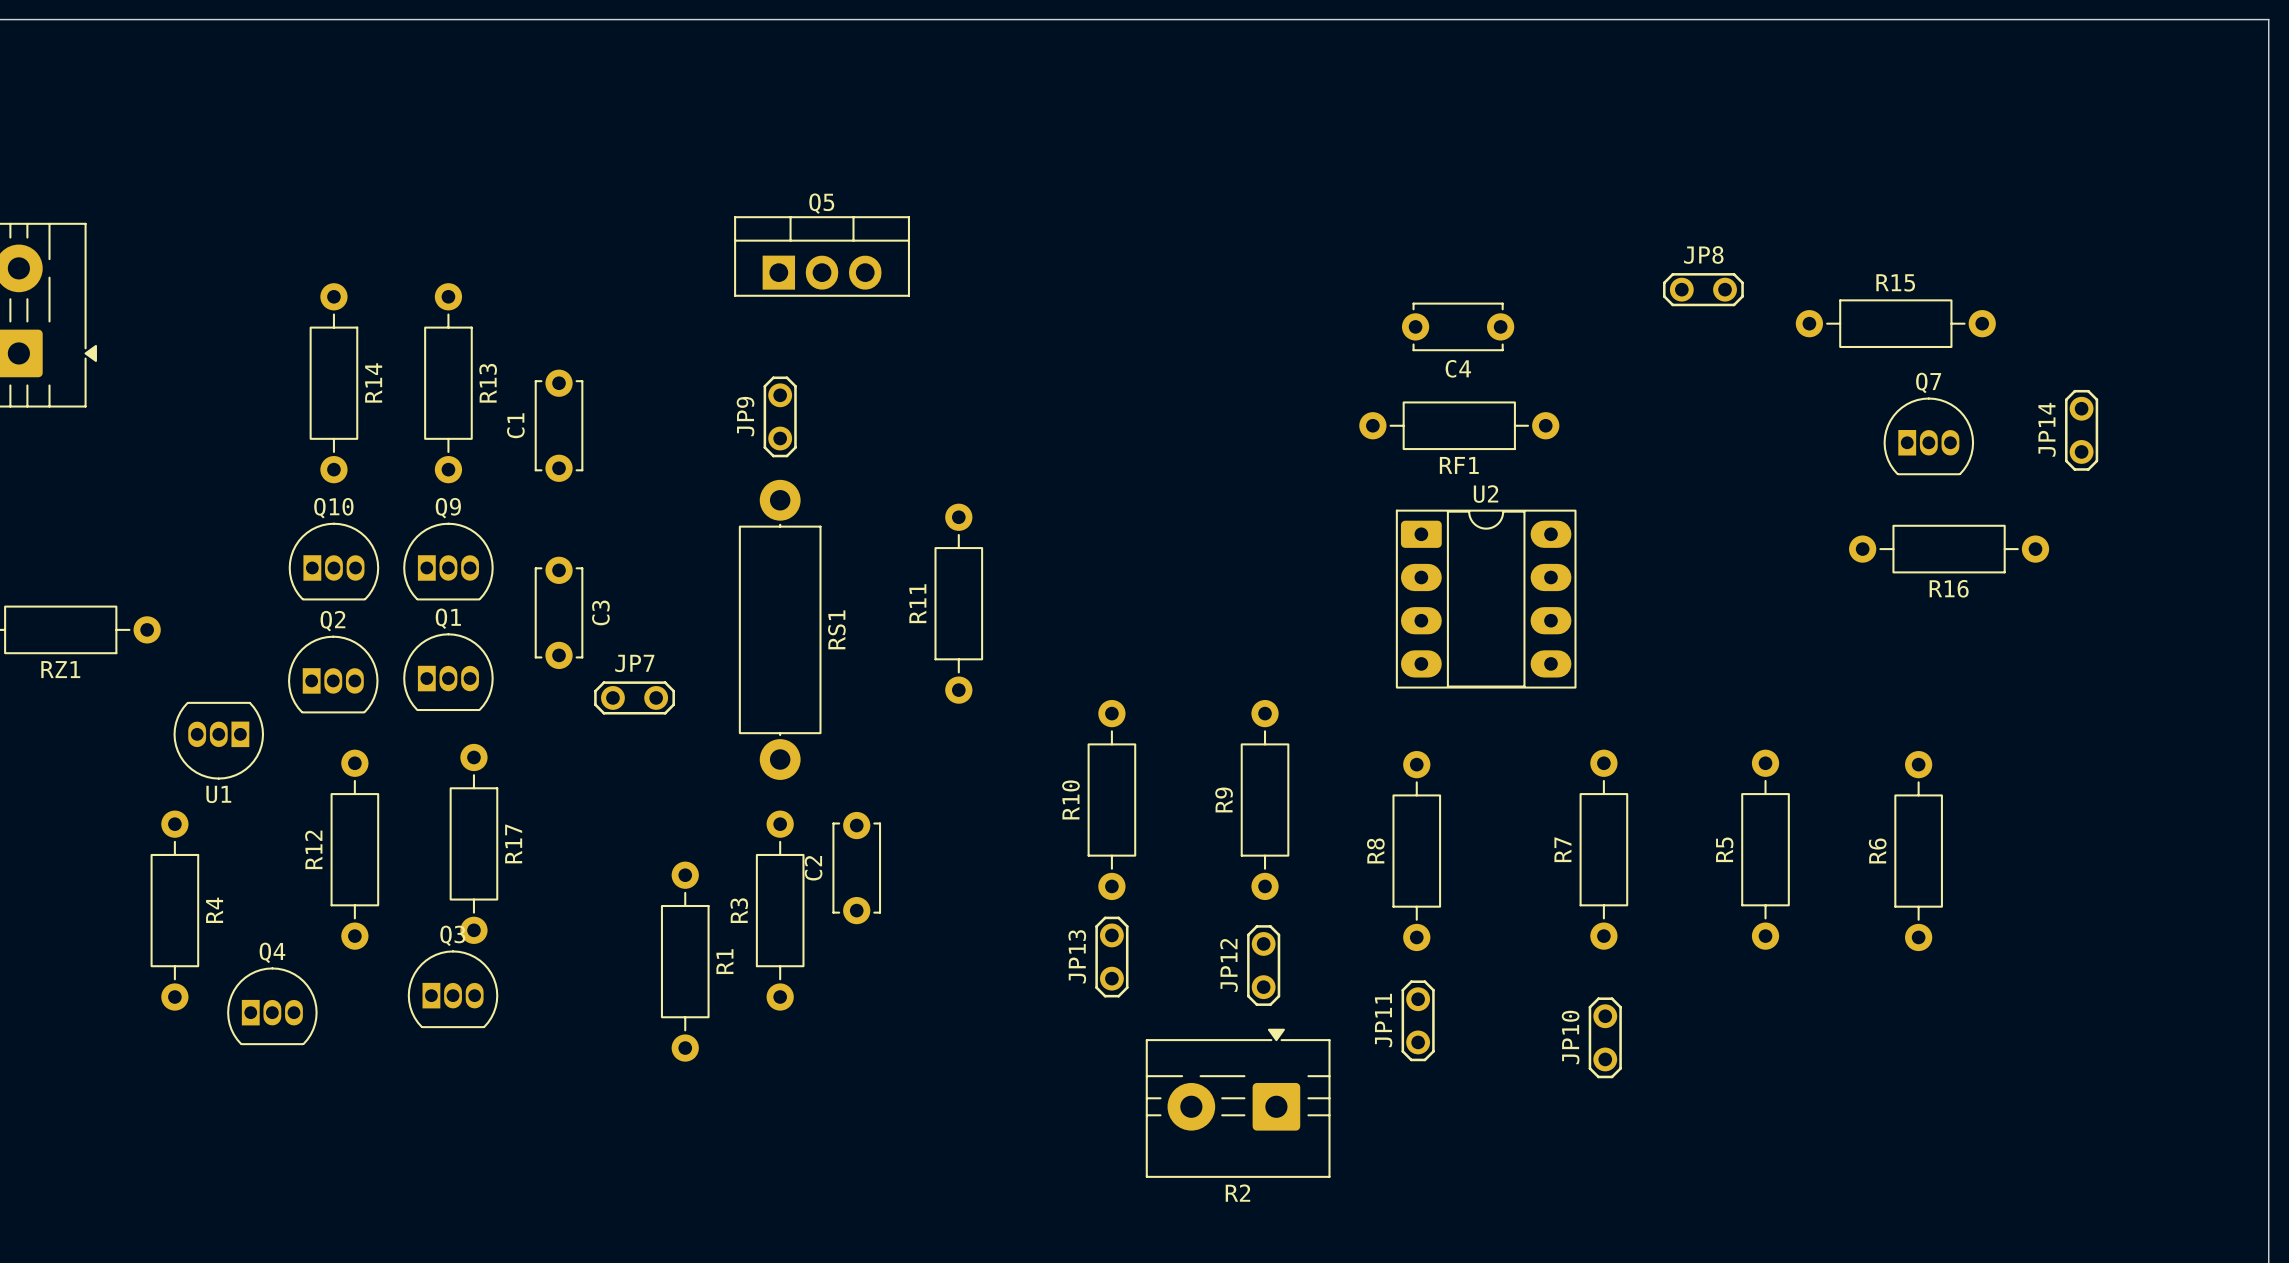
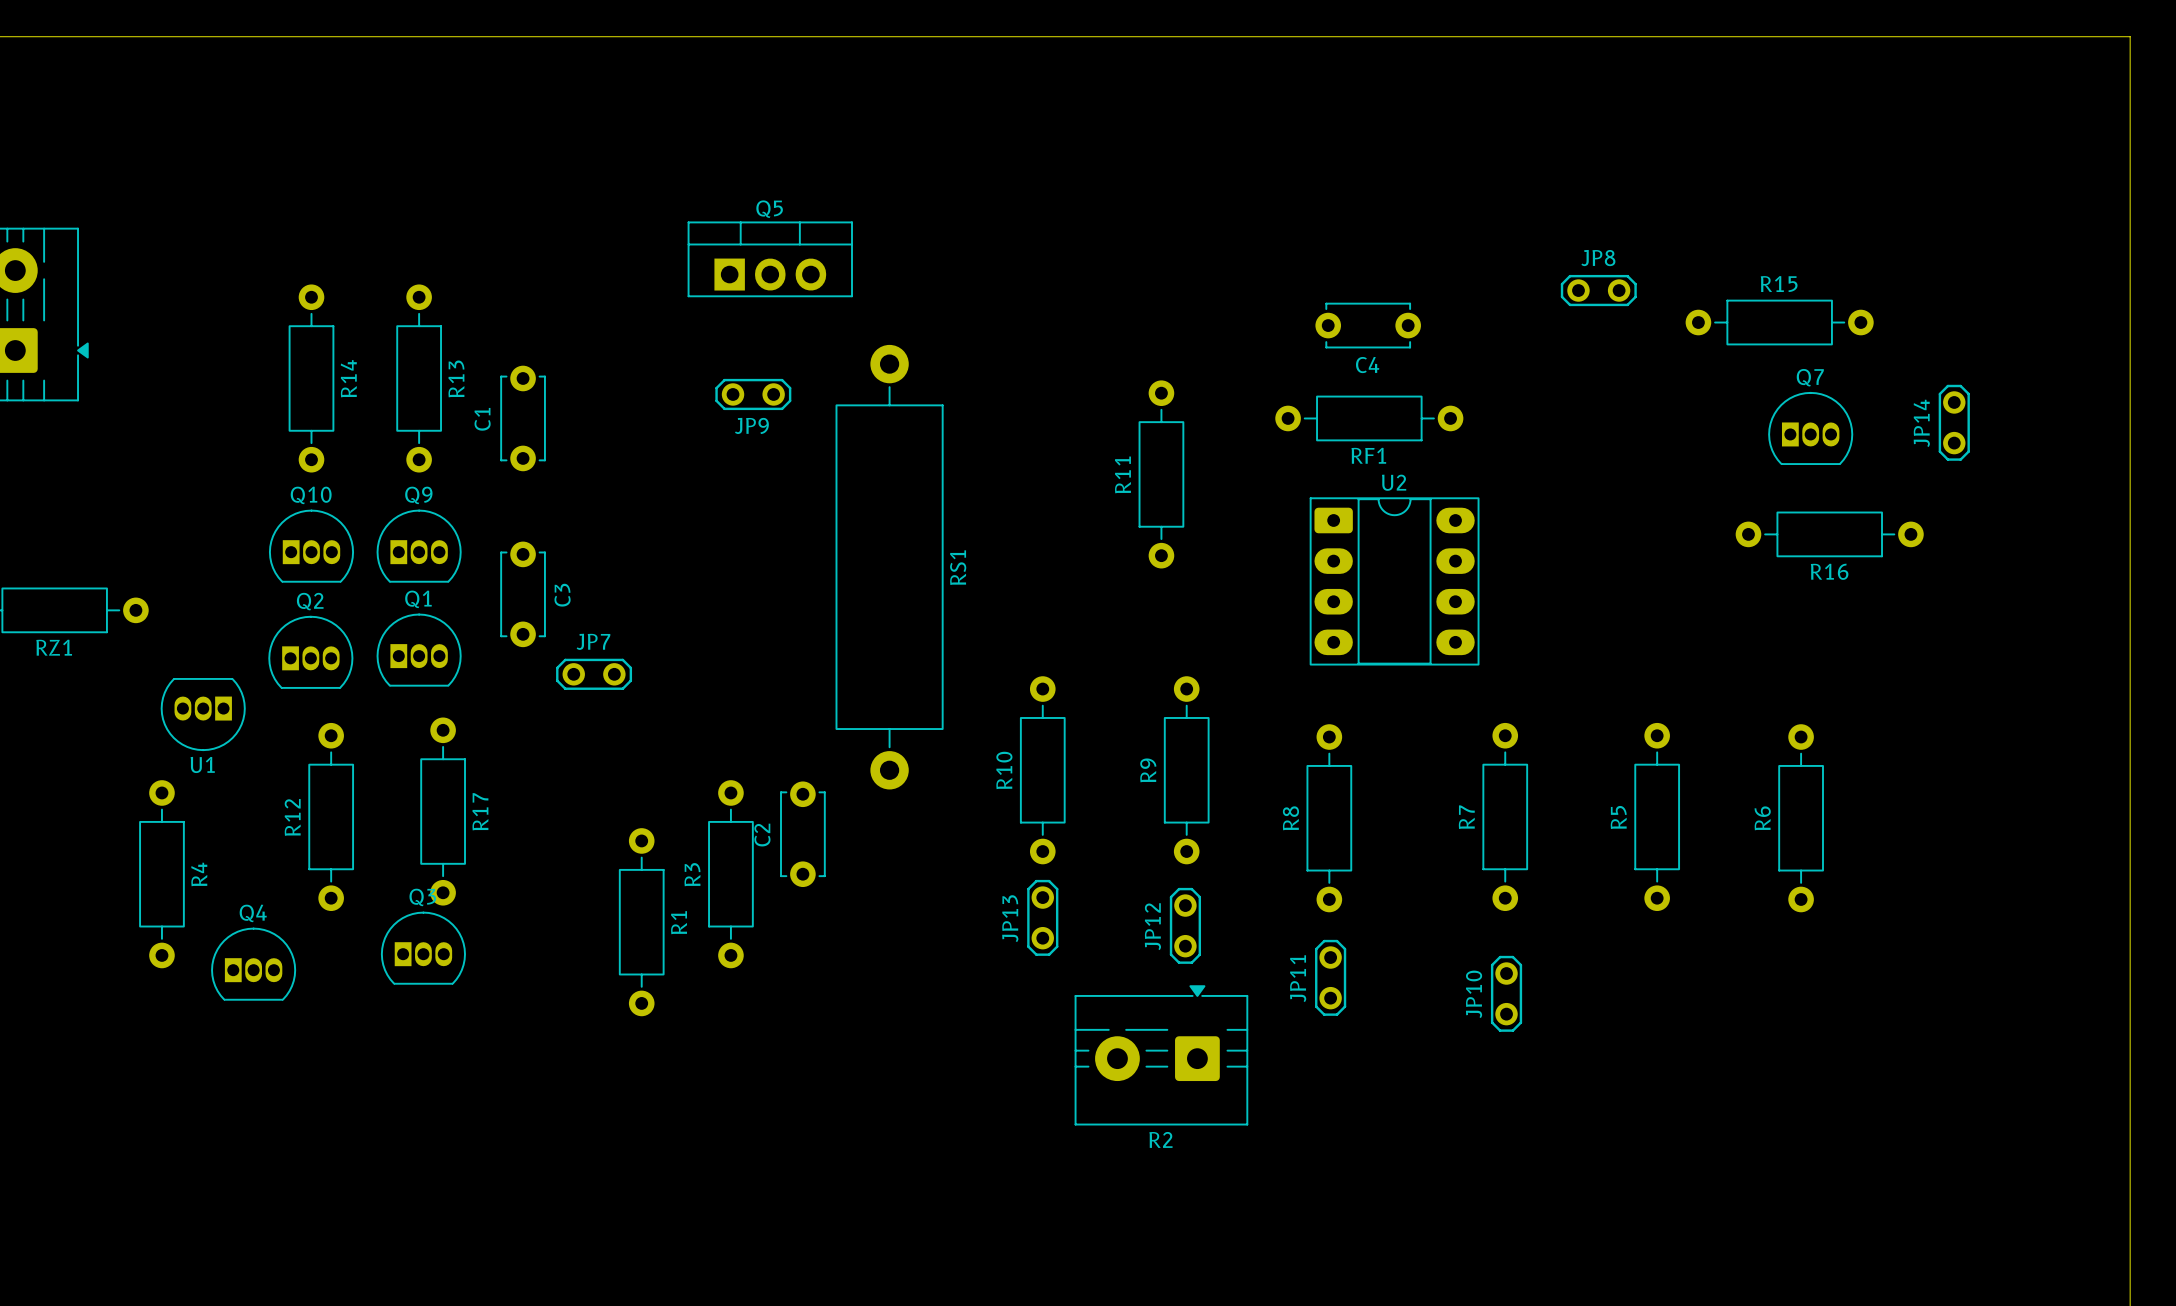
JP9 name position: JP9 (745, 416) -> JP9 (751, 425)
JP9 rotation: 0° (780, 416) -> 90° clockwise (753, 394)
RS1 footprint: [738, 479, 822, 780] -> [835, 344, 944, 790]
R11 position: (958, 603) -> (1161, 474)

